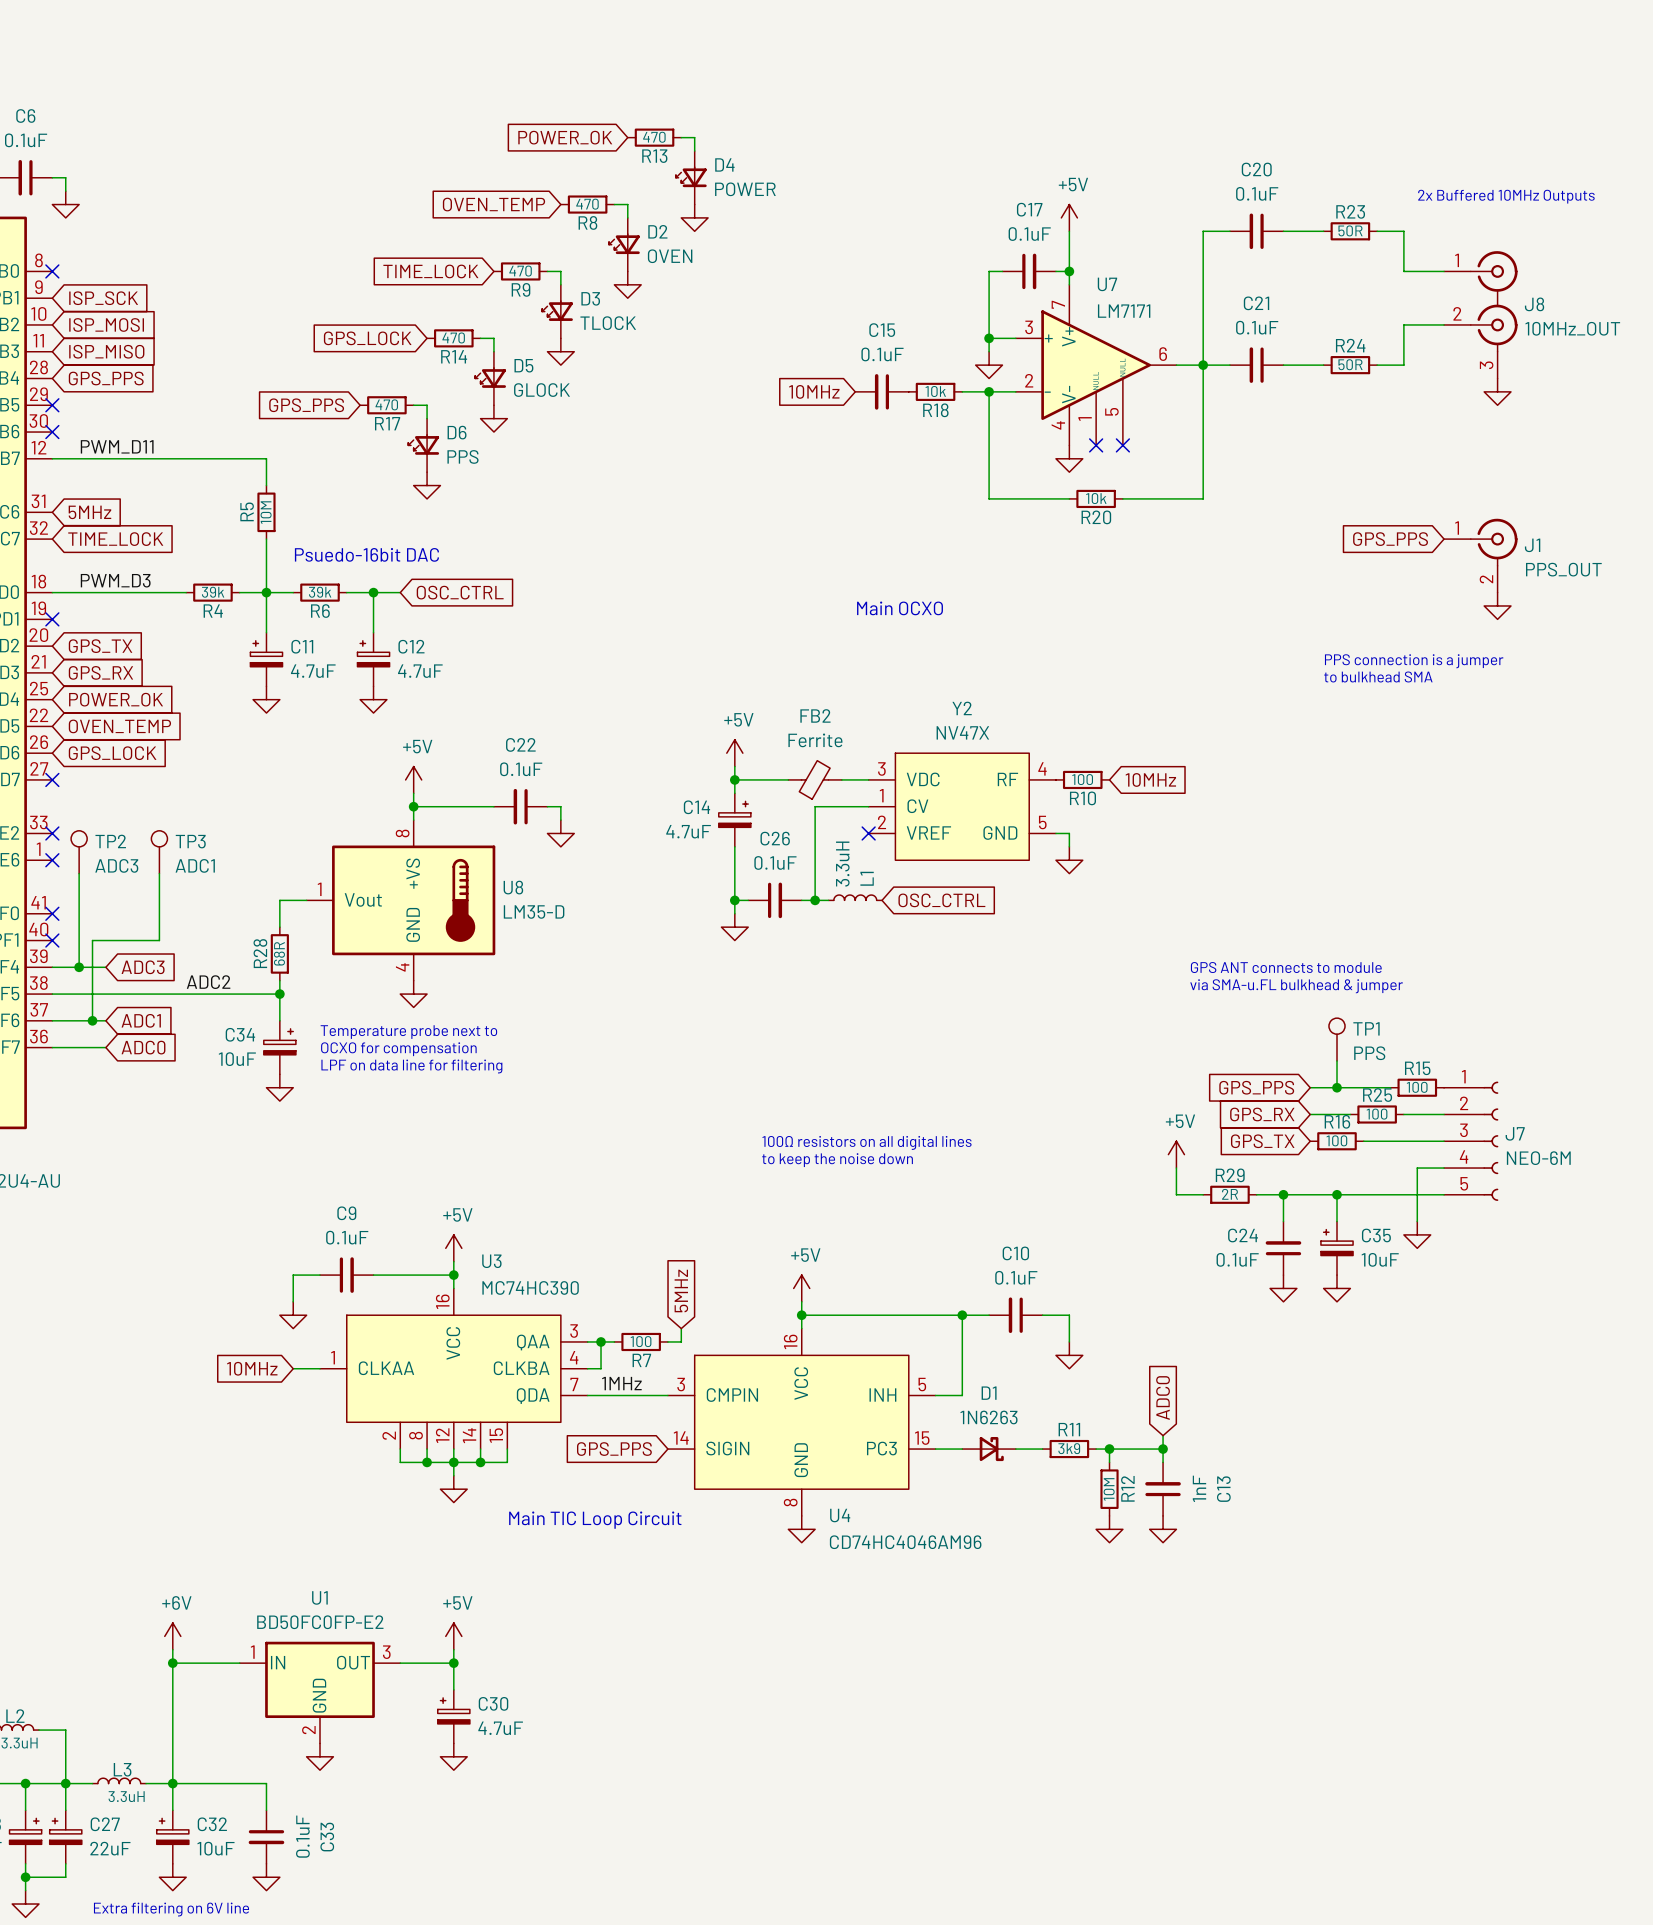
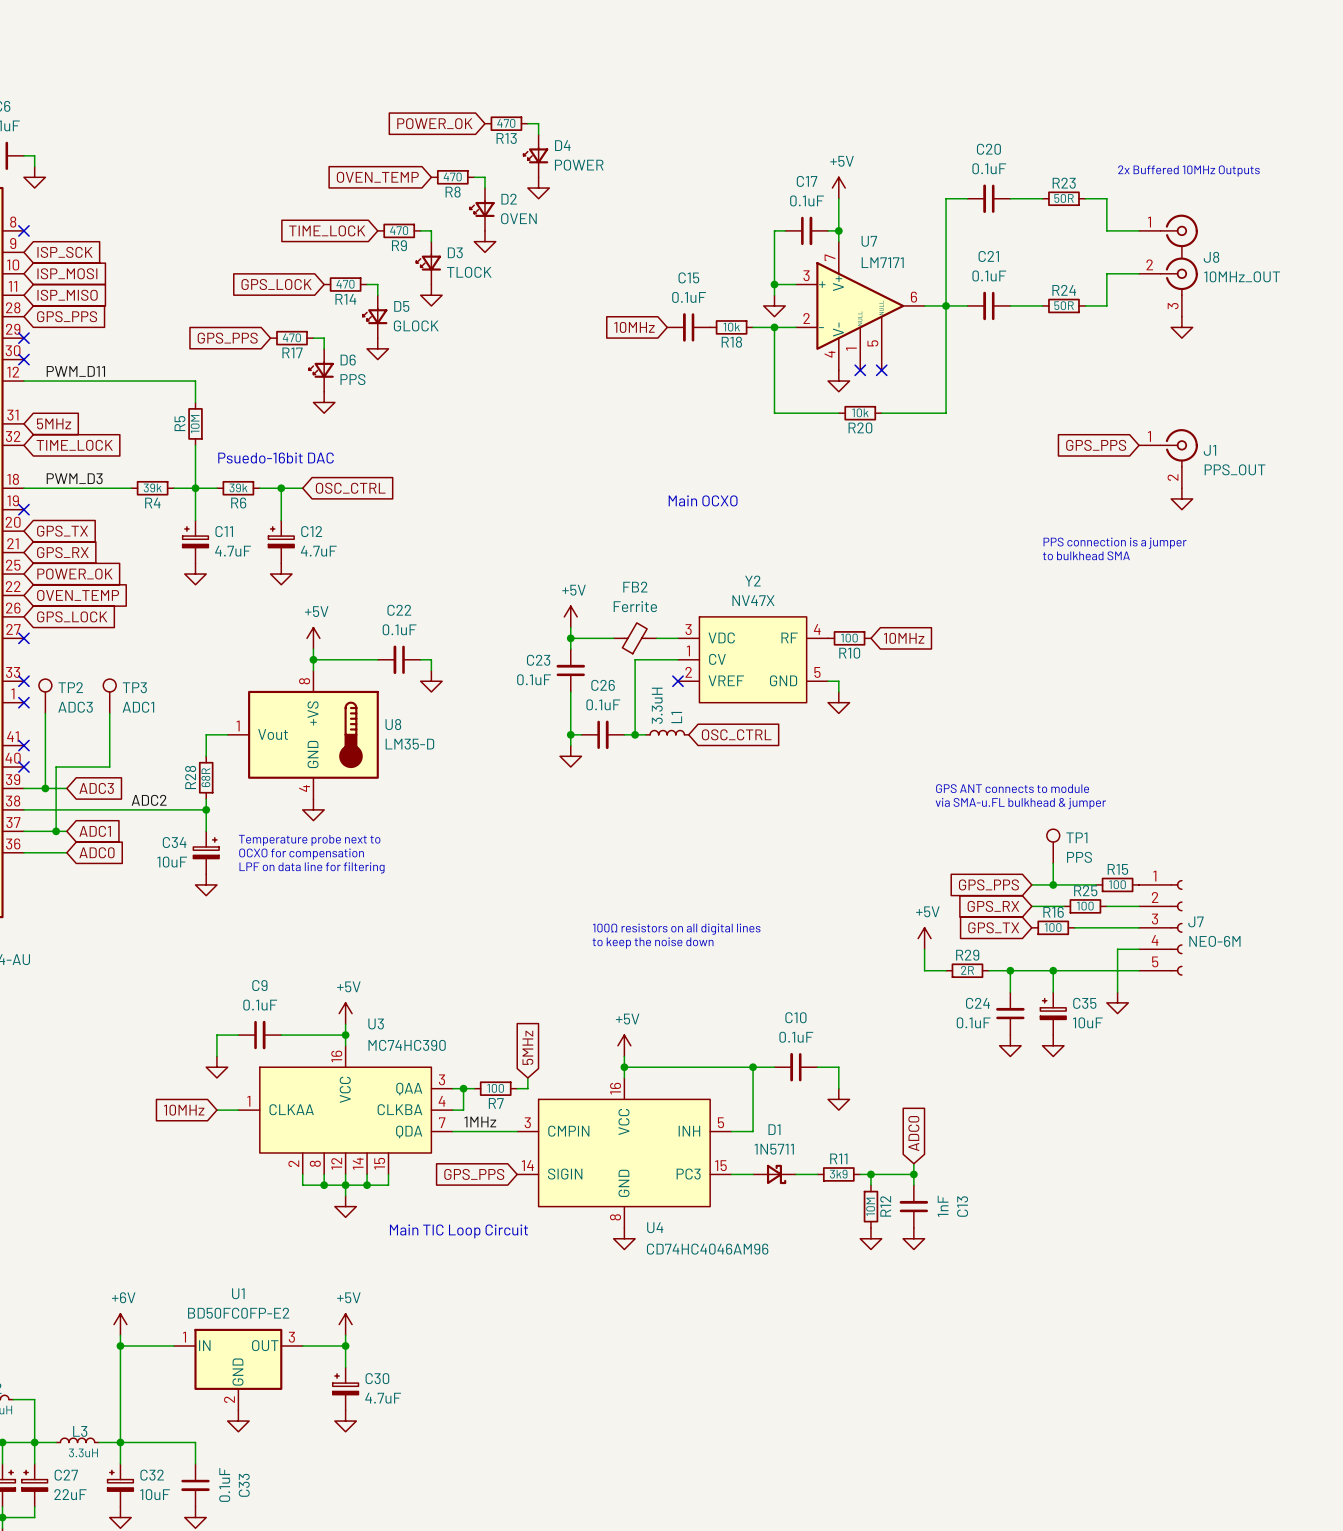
C14: 4.7uF (734, 820) -> none
C23: none -> 0.1uF (570, 670)
D1 value: 1N6263 (989, 1417) -> 1N5711 (774, 1149)

